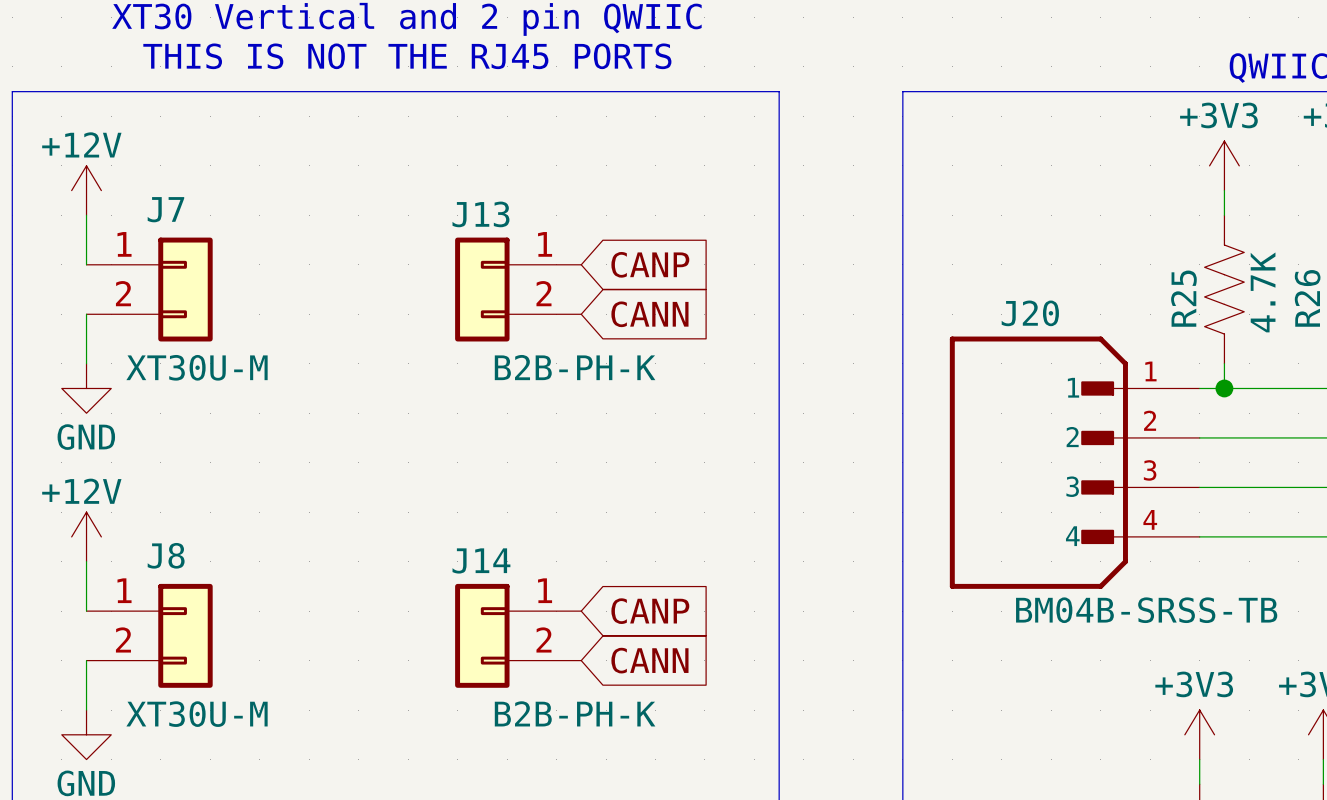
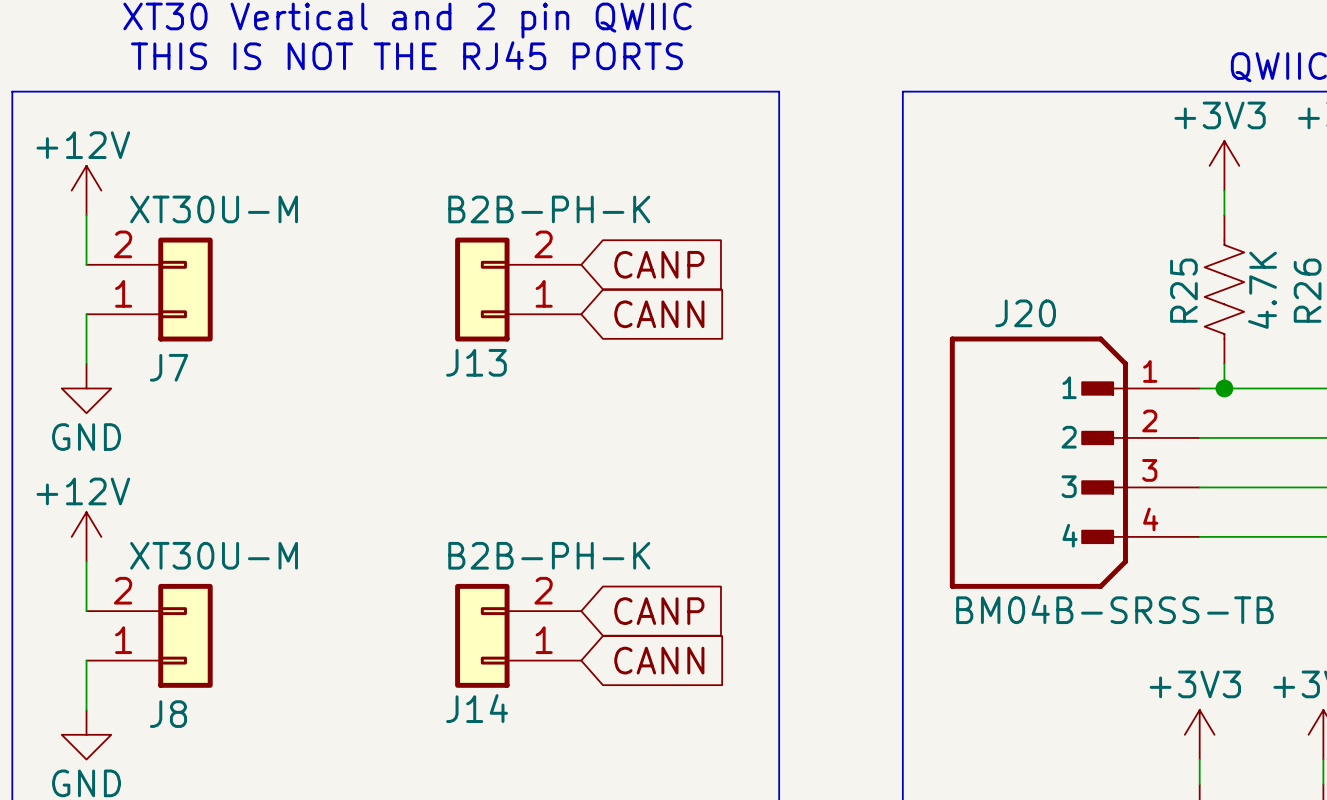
J7 flip: as is (185, 289) -> up-down (185, 289)
J13 flip: as is (482, 289) -> up-down (482, 289)
J8 flip: as is (185, 635) -> up-down (185, 635)
J14 flip: as is (482, 635) -> up-down (482, 635)

